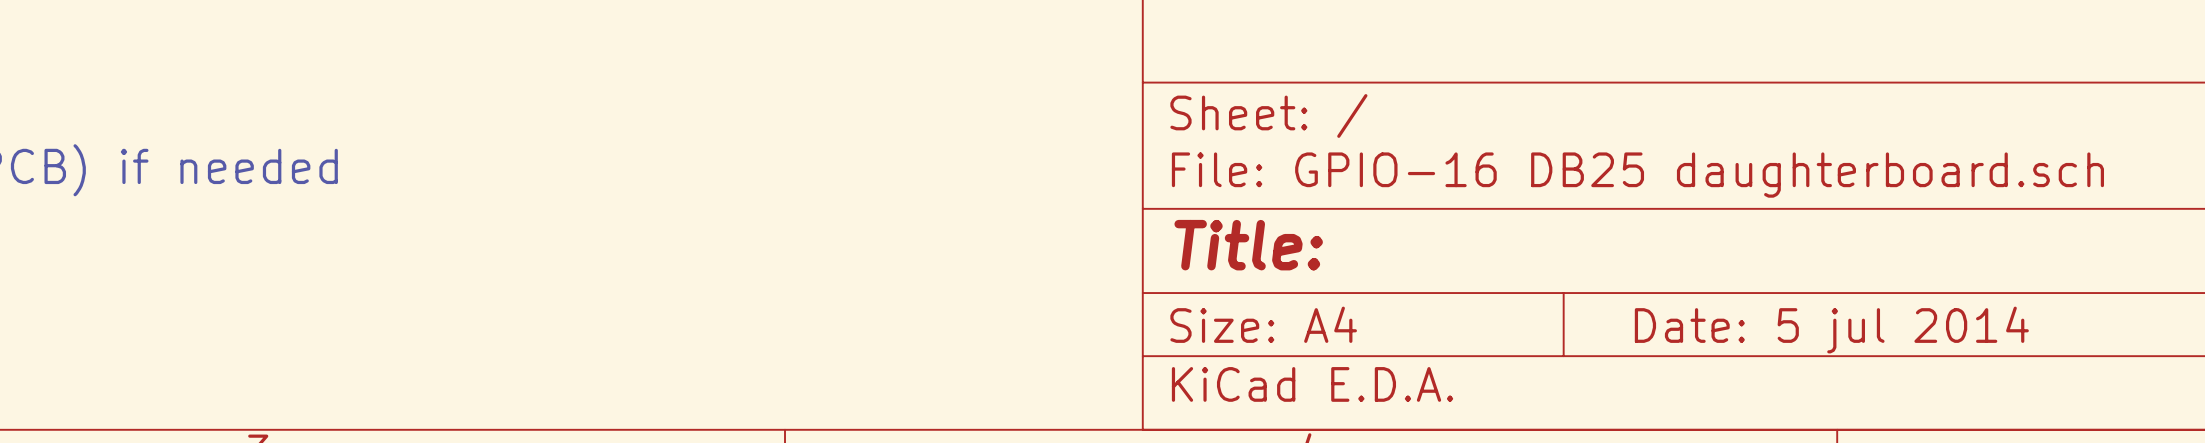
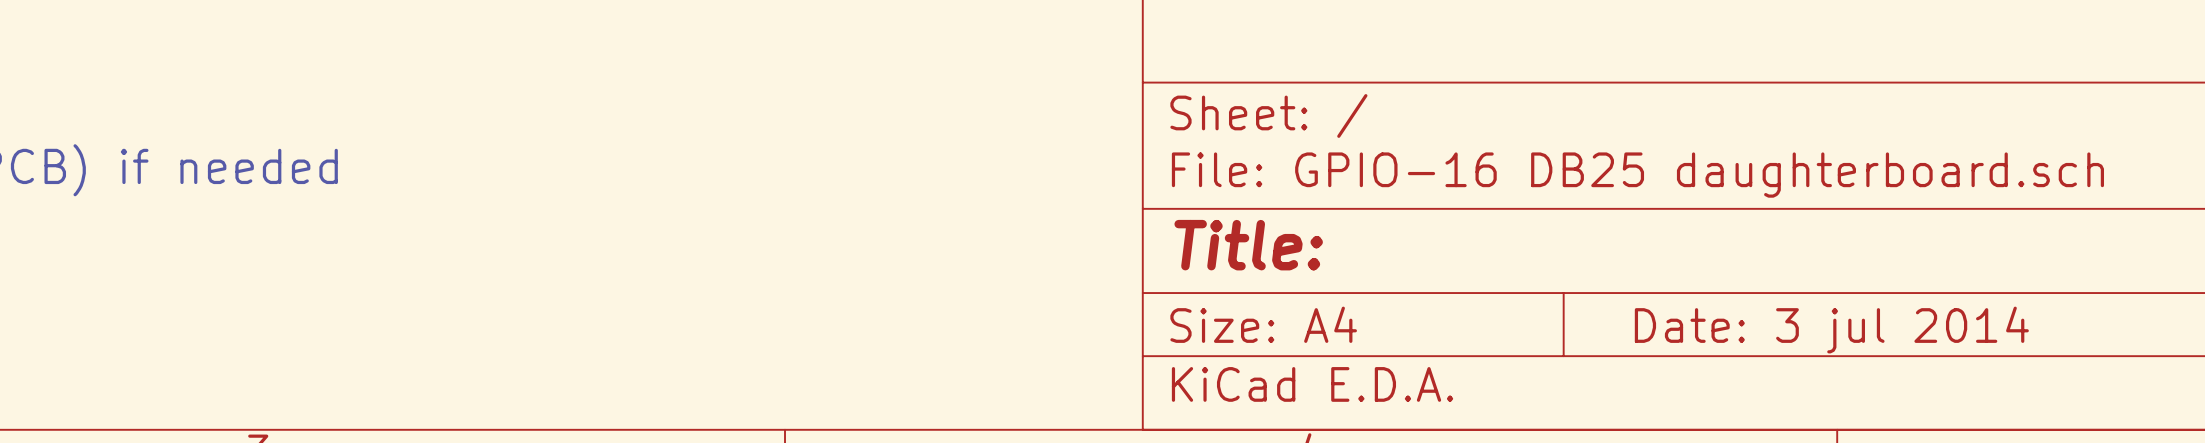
title block: Date: 5 jul 2014 (1831, 330) -> Date: 3 jul 2014 (1831, 330)

